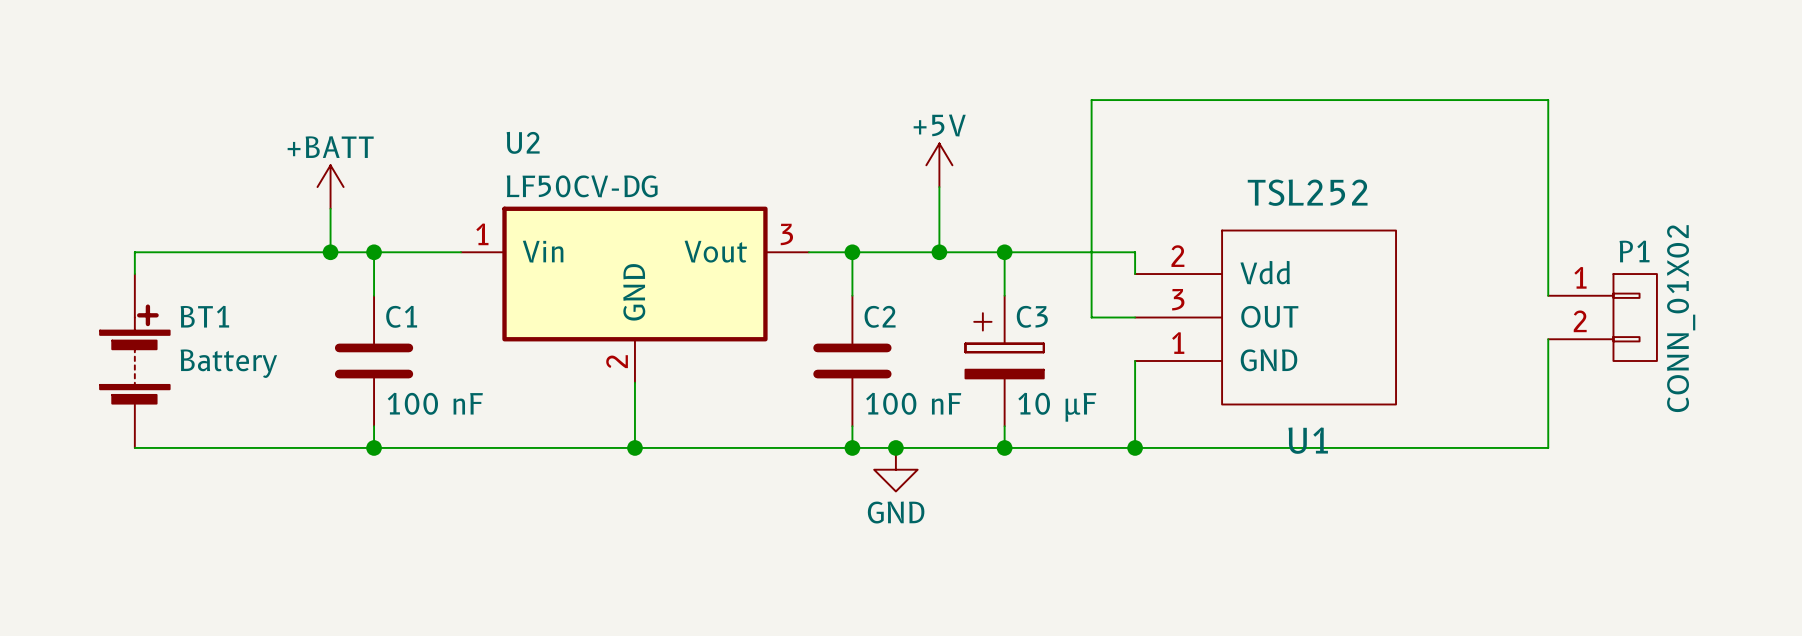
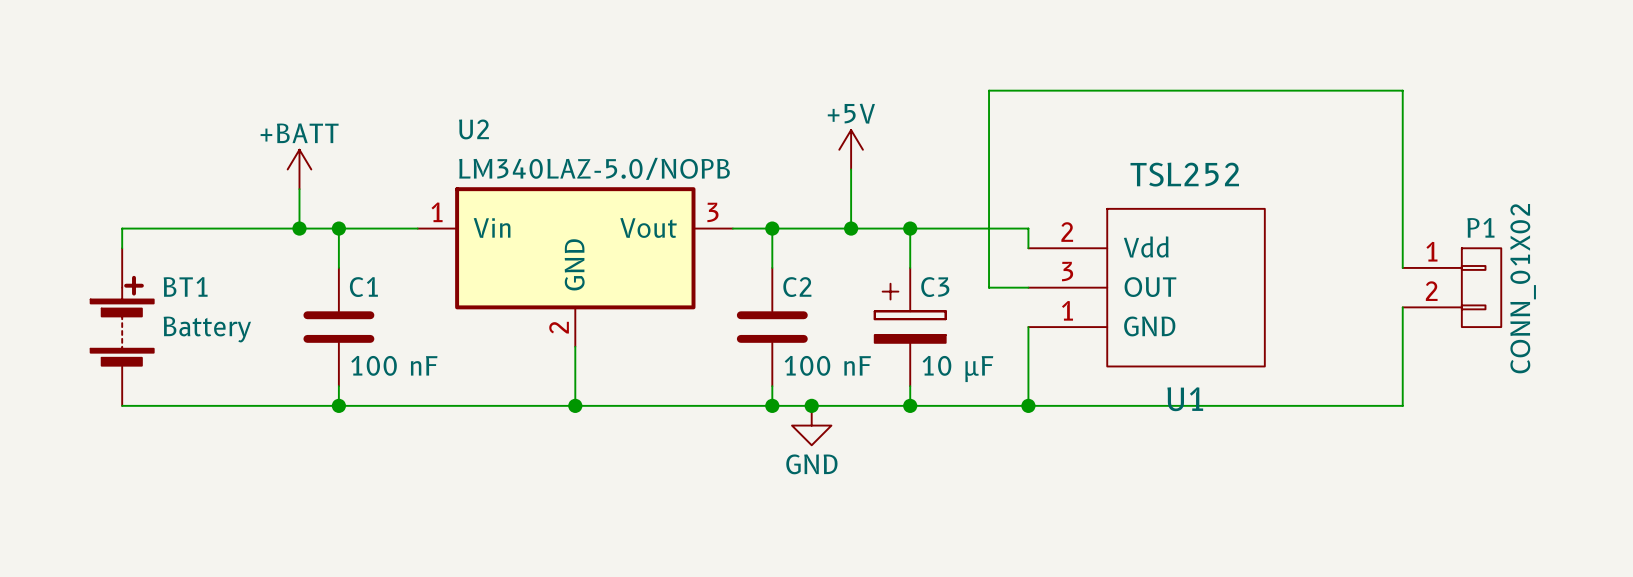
U2 value: LF50CV-DG (582, 186) -> LM340LAZ-5.0/NOPB (594, 168)

